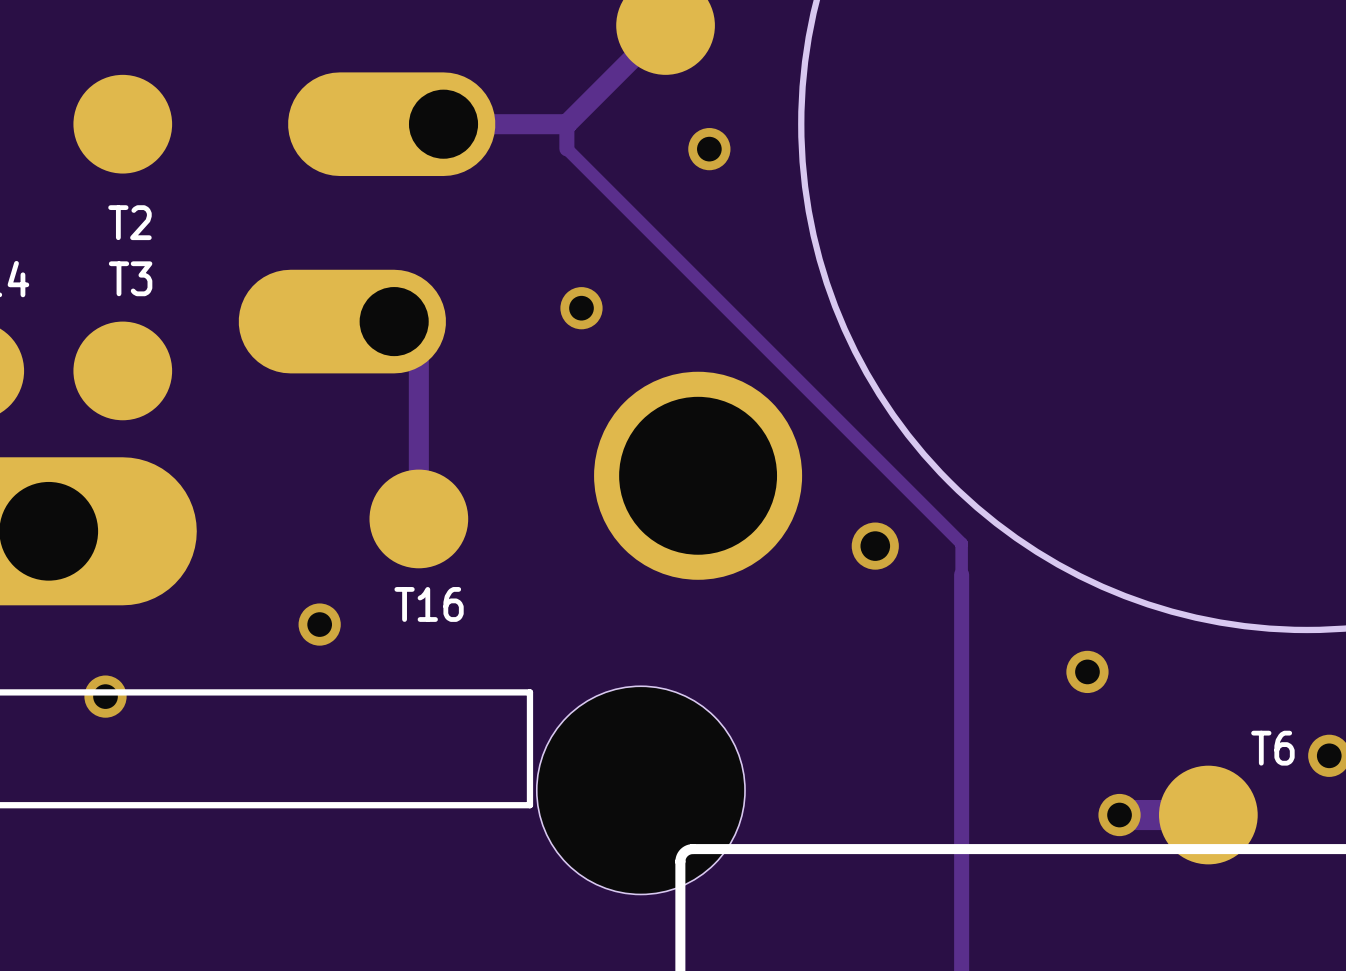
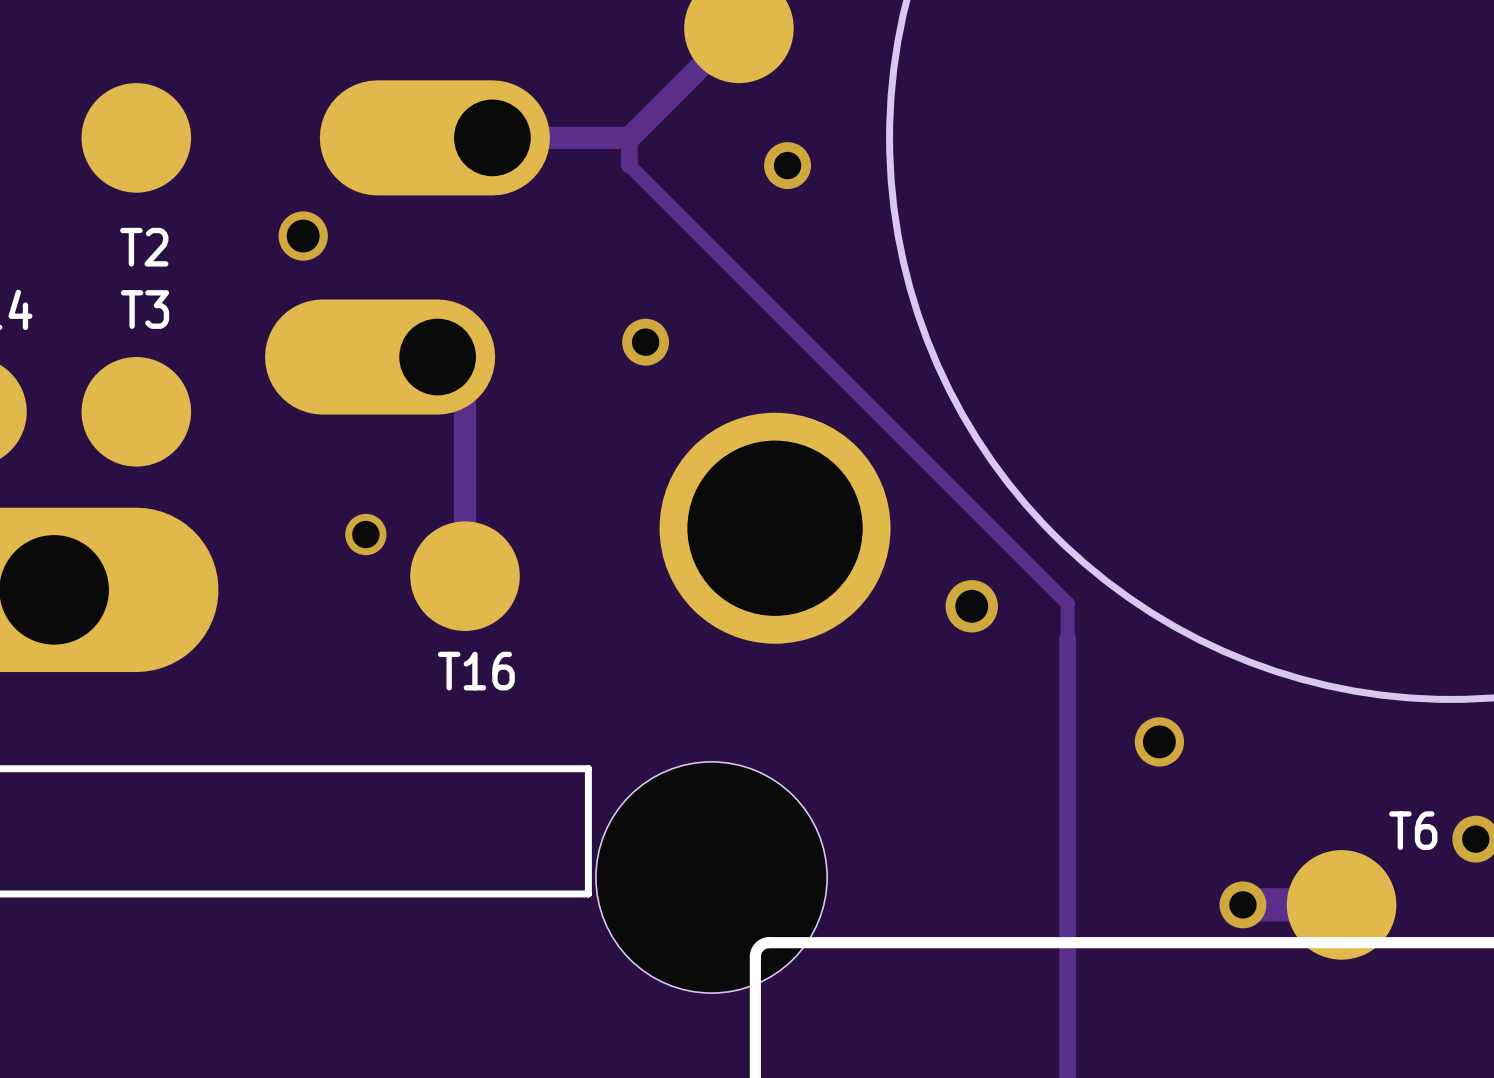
via: none -> (303, 236)
via: none -> (365, 534)
via: (319, 624) -> none
via position: (1087, 671) -> (1159, 741)
via: (105, 696) -> none

